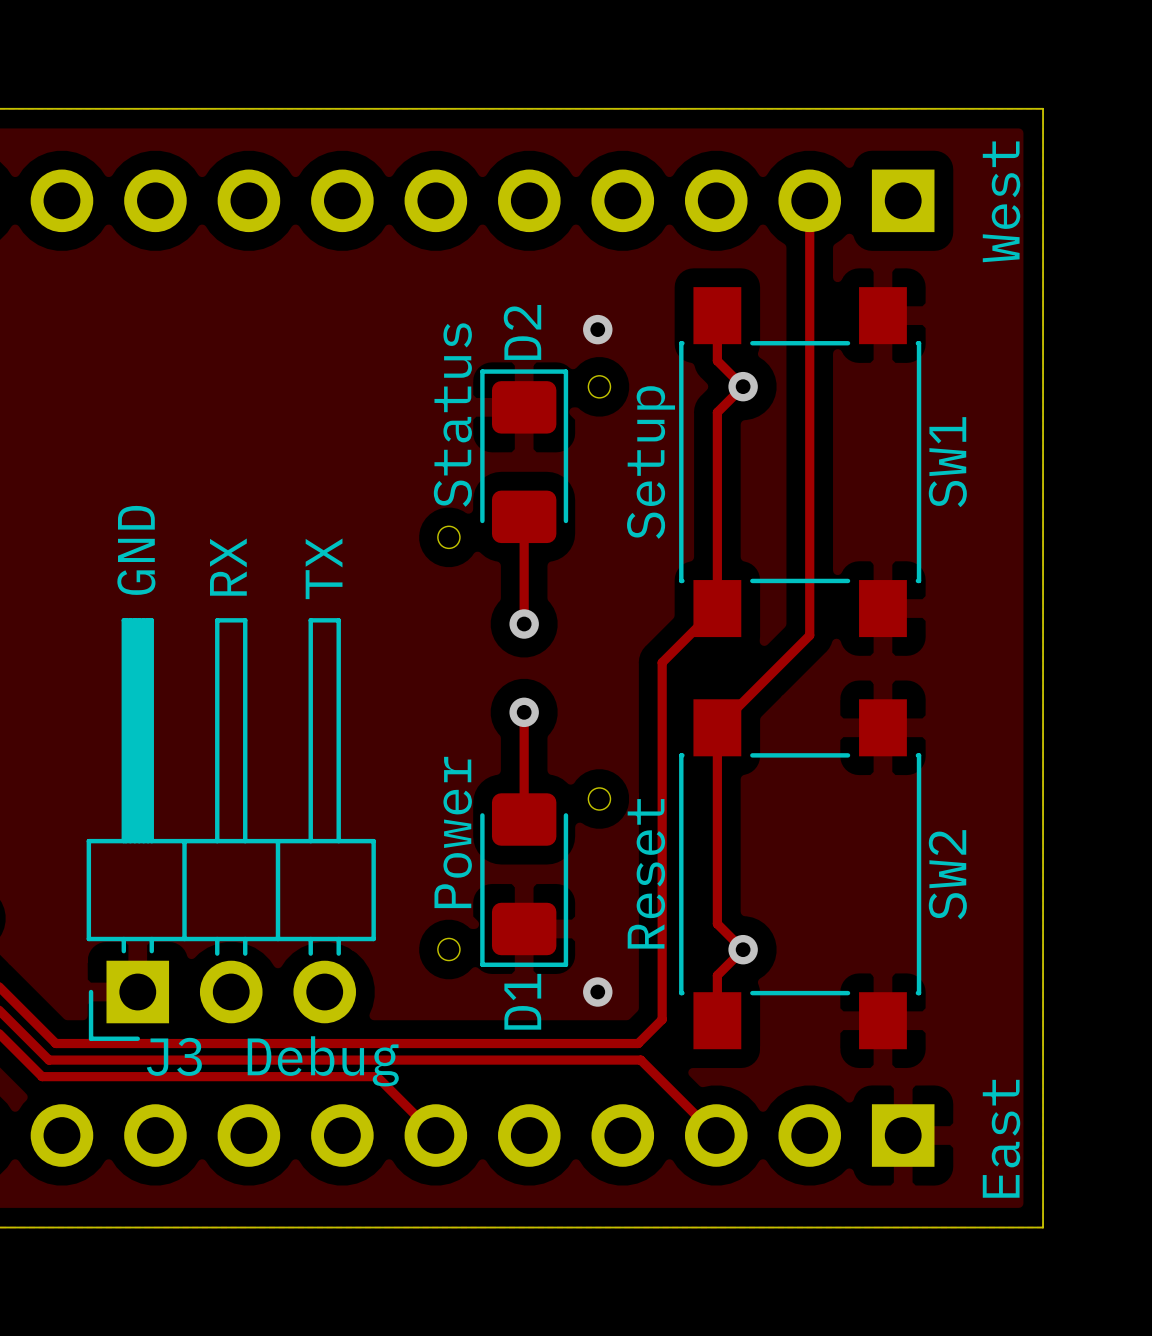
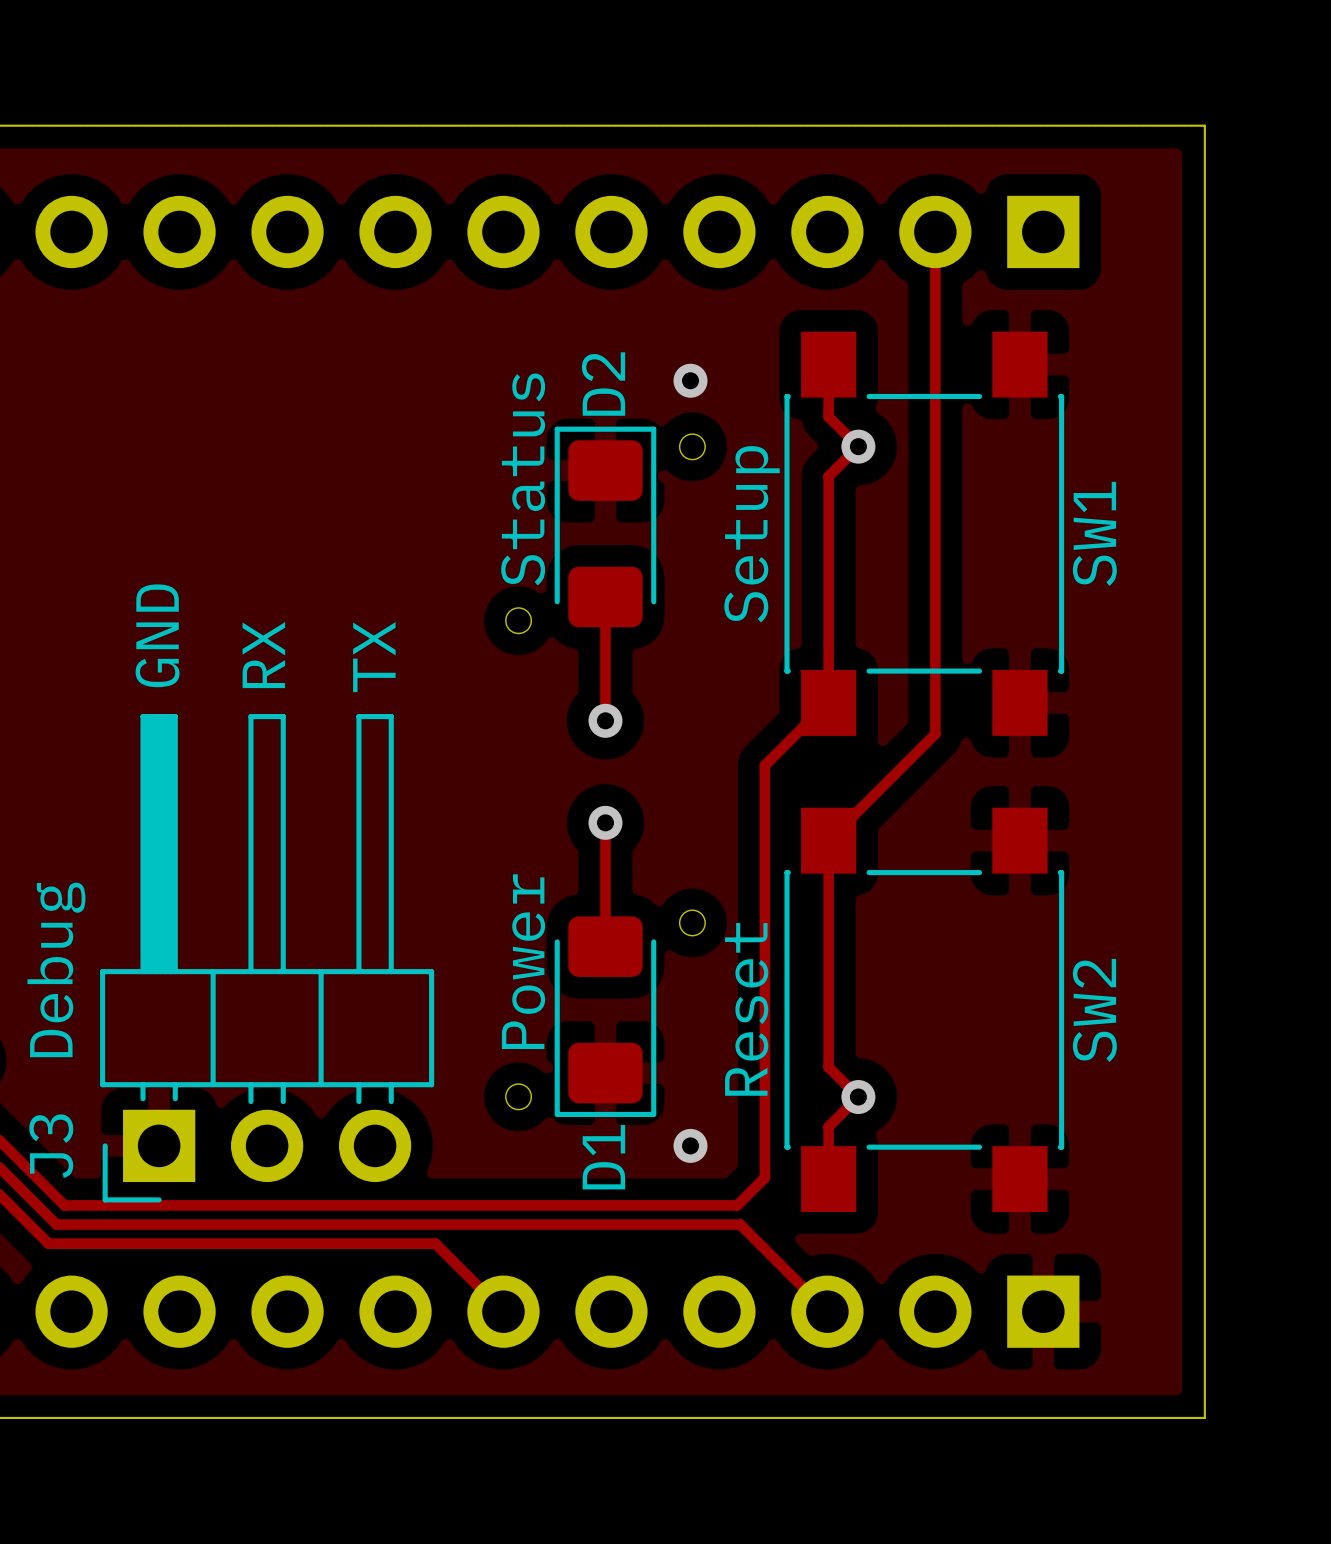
text: West (1001, 201) -> none
J3 name rotation: 0° (174, 1056) -> 90° counterclockwise (51, 1146)
J3 name position: J3 (174, 1056) -> J3 (51, 1146)
J3 value rotation: 0° (323, 1061) -> 90° counterclockwise (56, 969)
J3 value position: Debug (323, 1061) -> Debug (56, 969)
text: East (1001, 1138) -> none

